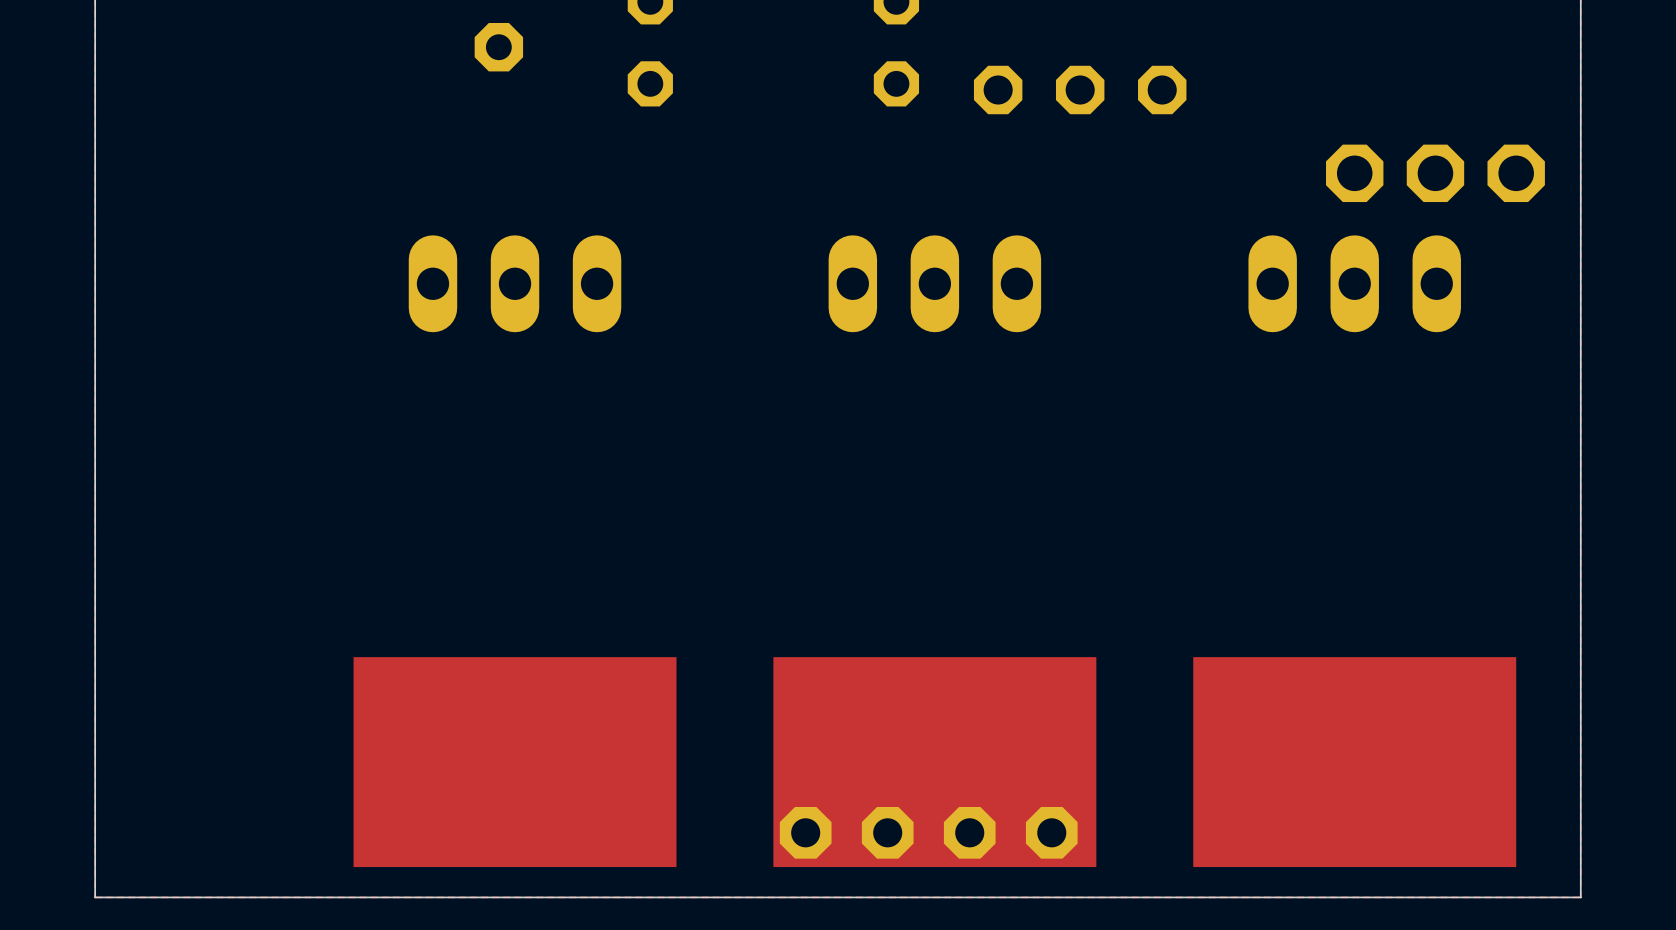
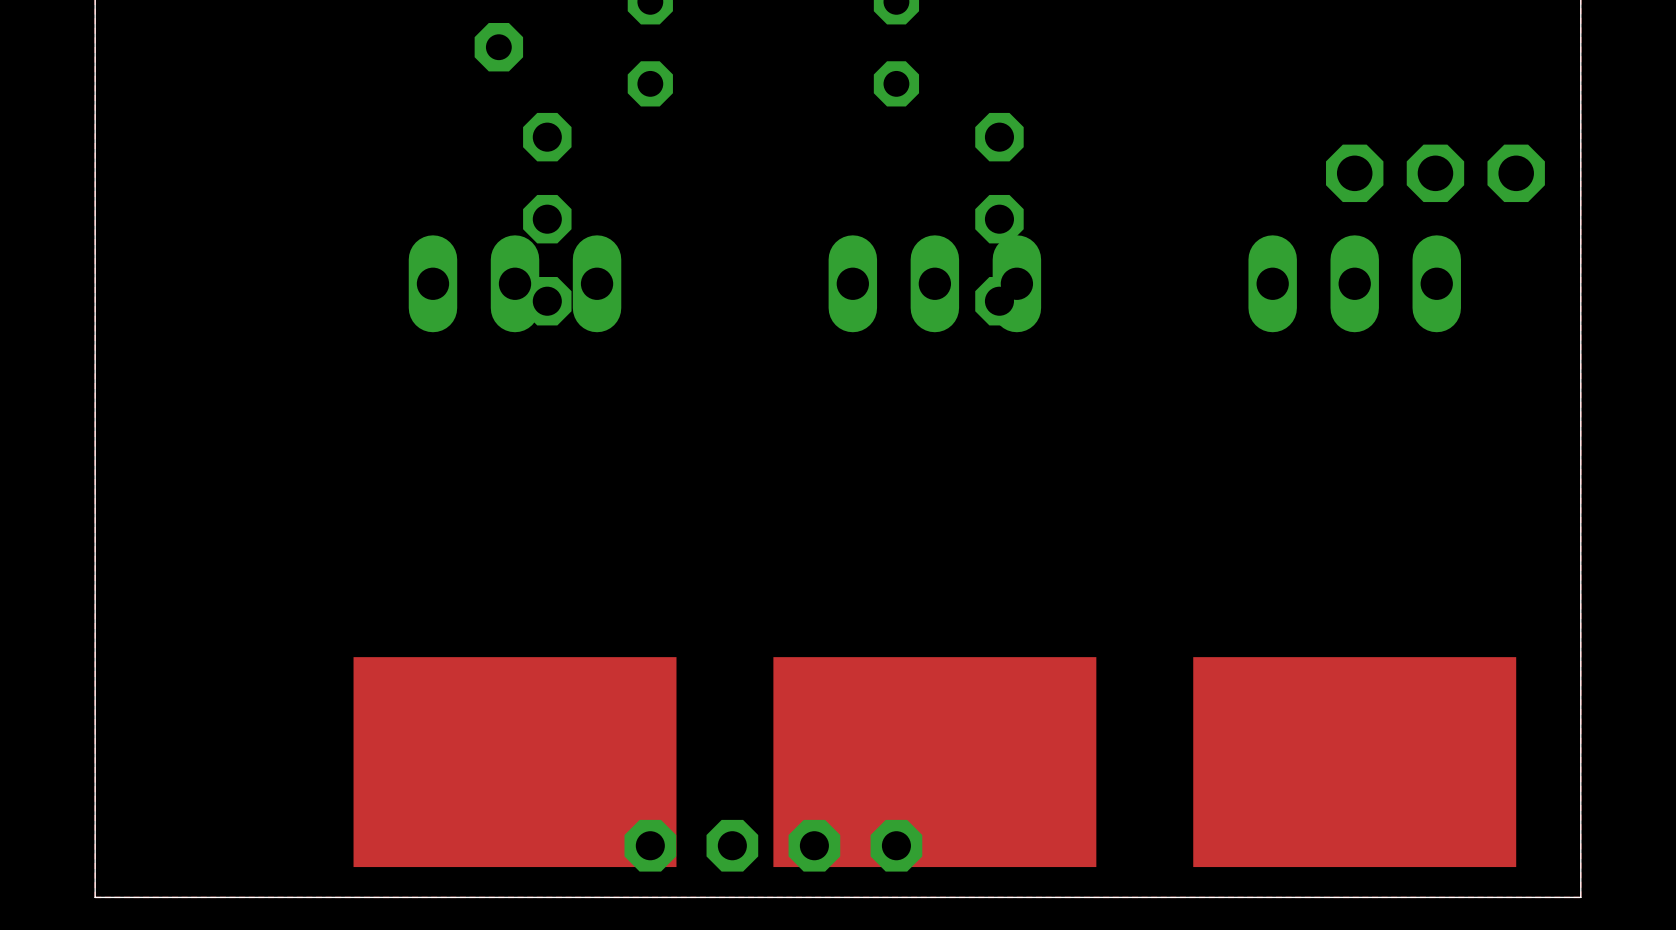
part: (1080, 90) -> none
part: none -> (547, 219)
part: none -> (999, 219)
part position: (928, 832) -> (773, 845)

